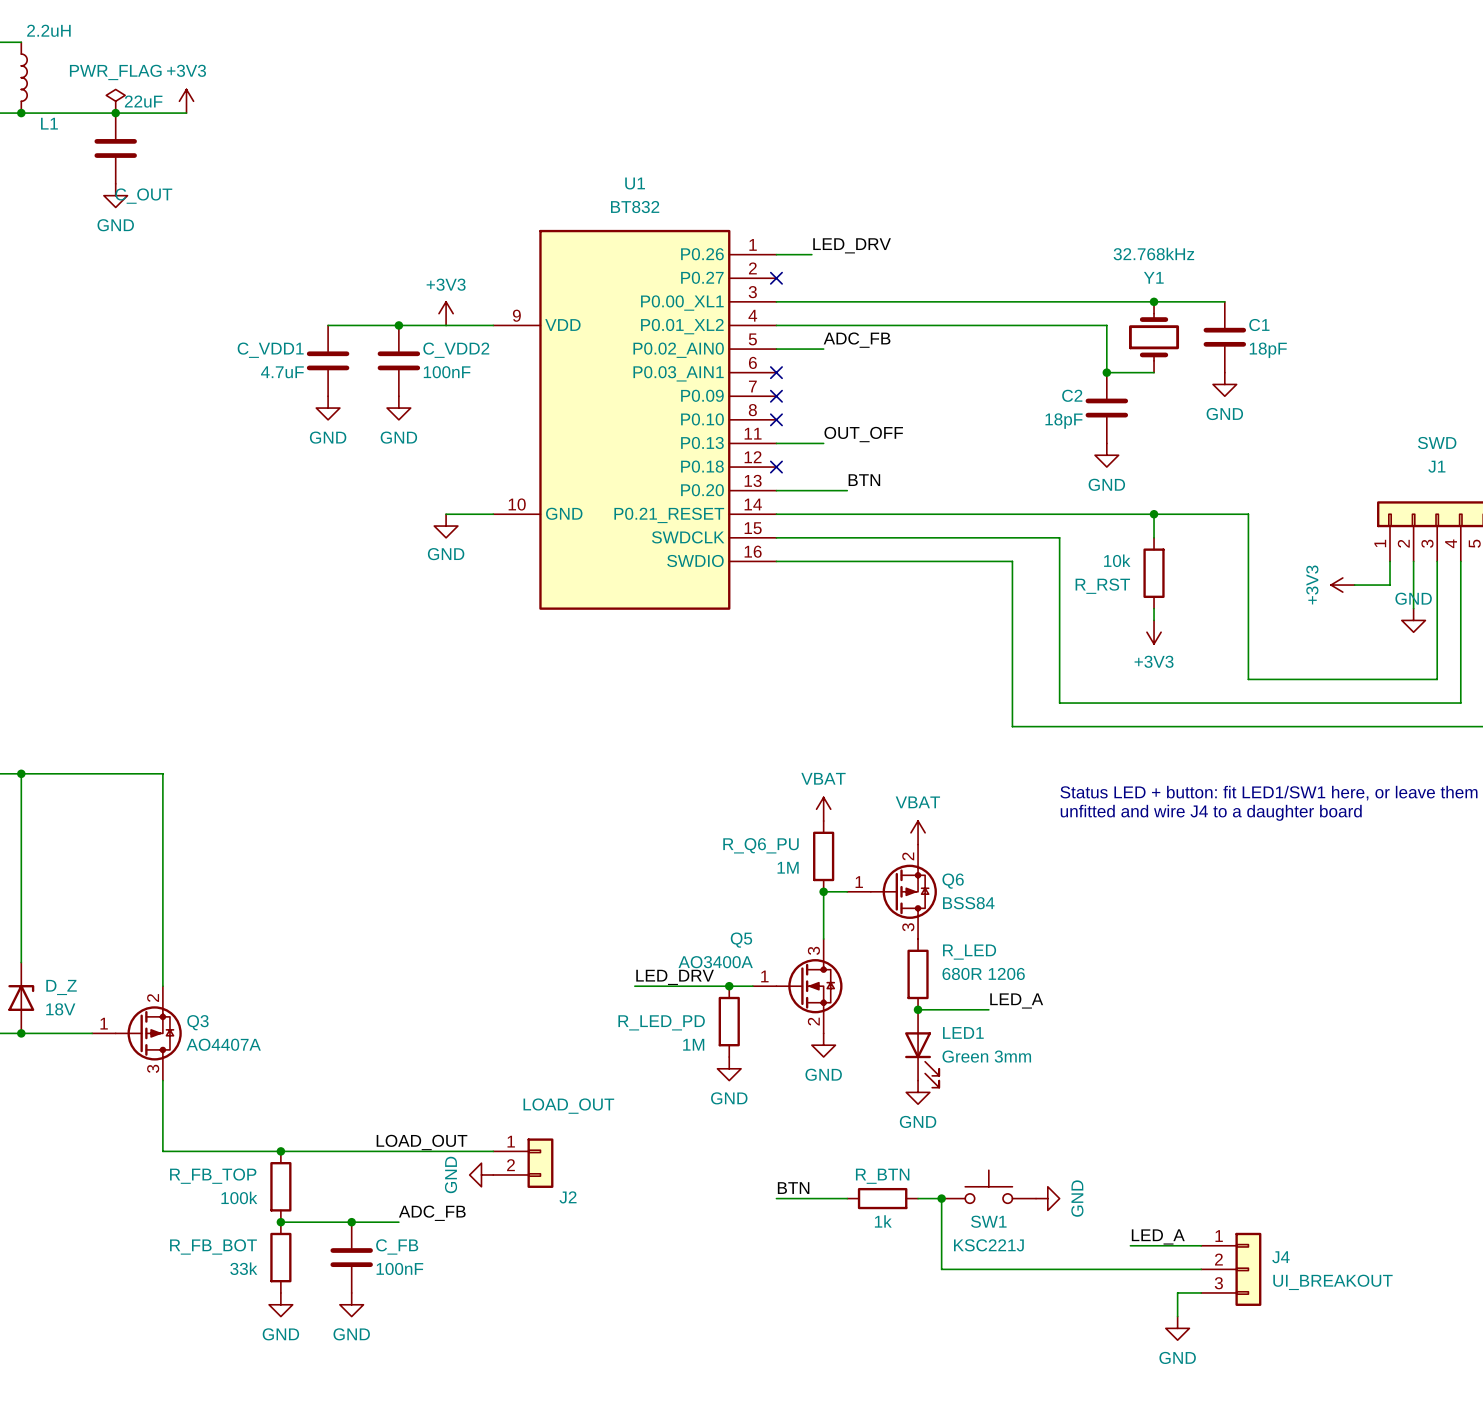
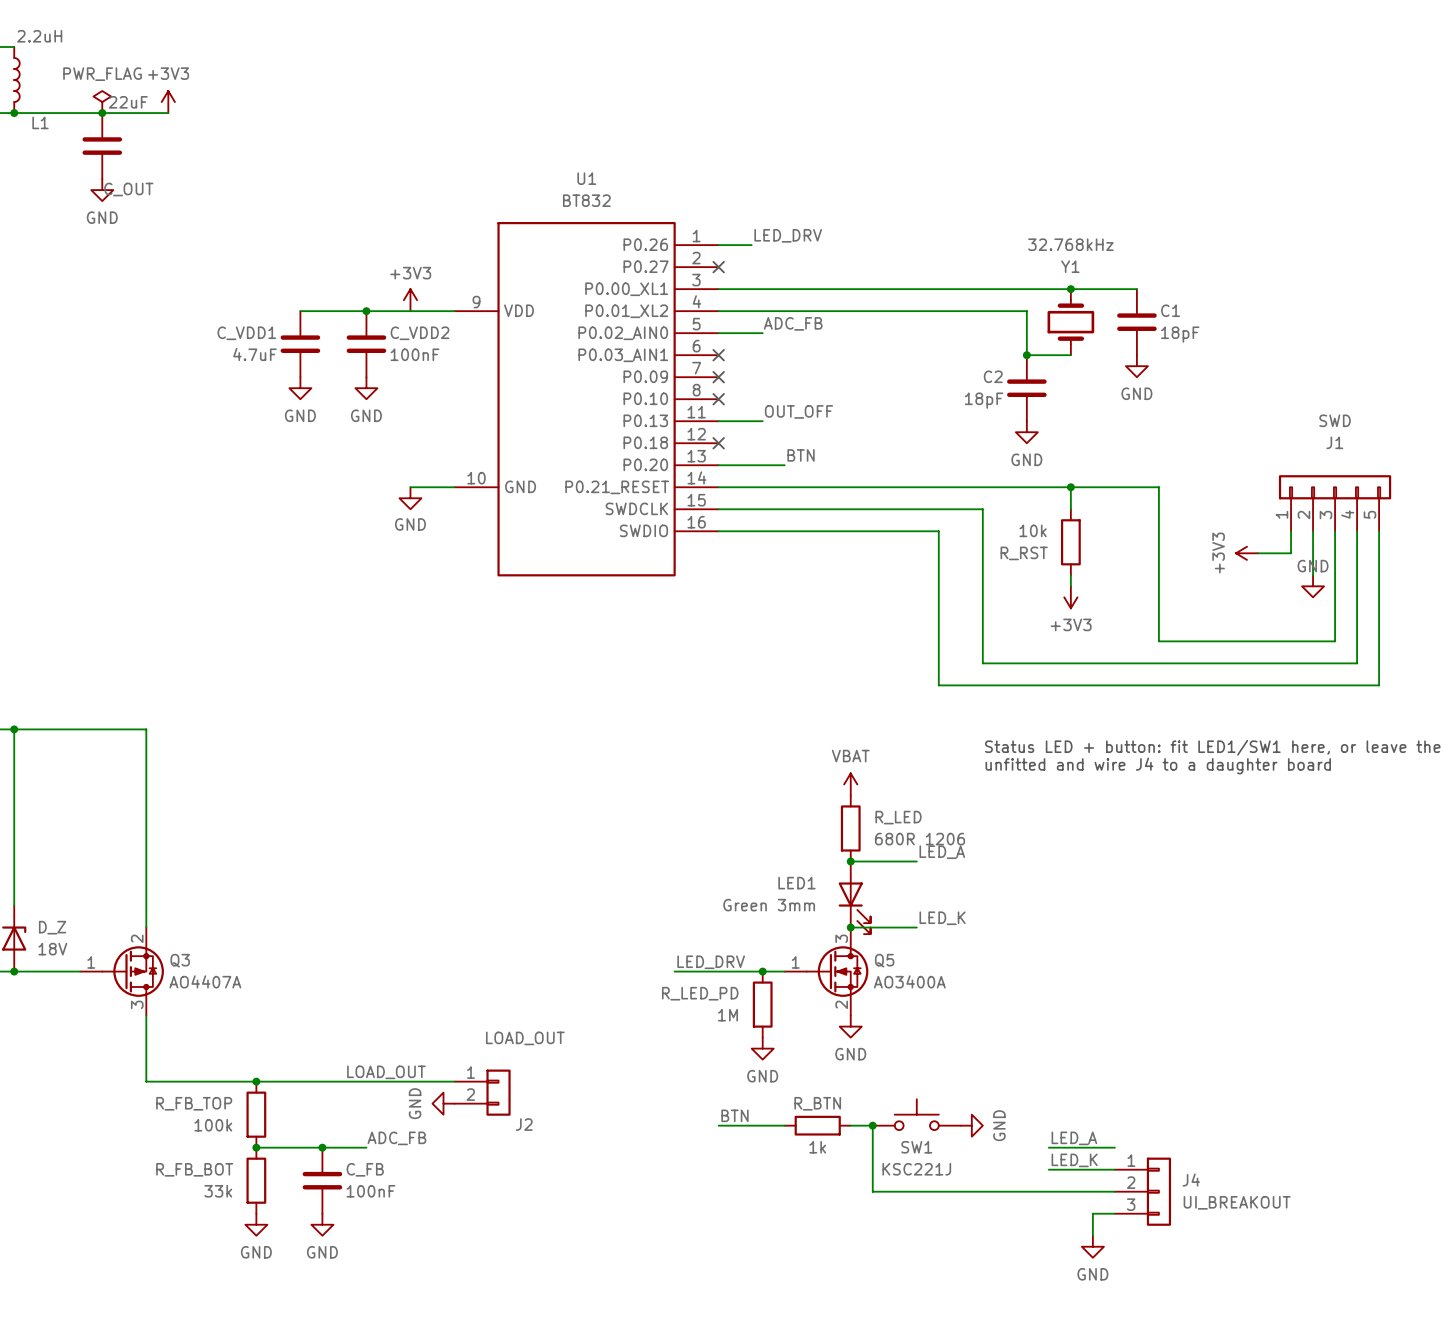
power symbol: VBAT (823, 809) -> none
R_Q6_PU: 1M (823, 856) -> none
junction: (823, 891) -> none
wire: (847, 891) (823, 891) (823, 939) -> none
Q6: BSS84 (892, 891) -> none
wire: none -> (850, 861) (916, 861)
junction: none -> (850, 861)
Q5 name position: Q5 (741, 940) -> Q5 (884, 960)
R_LED name position: R_LED (969, 952) -> R_LED (898, 817)
Q5 value position: AO3400A (715, 962) -> AO3400A (909, 981)
R_LED value position: 680R 1206 (983, 973) -> 680R 1206 (920, 839)
R_LED position: (918, 974) -> (850, 828)
label position: LED_DRV (675, 977) -> LED_DRV (711, 962)
label: none -> LED_K (942, 918)
wire: (634, 986) (752, 986) -> (674, 971) (784, 971)
junction: (729, 986) -> none
Q5 position: (797, 986) -> (826, 971)
label position: LED_A (1016, 1000) -> LED_A (942, 852)
wire: (918, 1009) (988, 1009) -> (850, 927) (916, 927)
junction position: (918, 1009) -> (850, 927)
R_LED_PD position: (729, 1021) -> (762, 1004)
R_LED_PD name position: R_LED_PD (661, 1022) -> R_LED_PD (700, 993)
LED1 name position: LED1 (963, 1032) -> LED1 (796, 883)
junction: none -> (762, 971)
R_LED_PD value position: 1M (693, 1044) -> 1M (728, 1015)
power symbol: GND (823, 1045) -> none
LED1 position: (922, 1048) -> (854, 897)
LED1 value position: Green 3mm (986, 1056) -> Green 3mm (769, 905)
power symbol: GND (729, 1068) -> none
power symbol: none -> GND (762, 1048)
label: none -> LED_A (1074, 1138)
wire: none -> (1048, 1147) (1114, 1147)
label: LED_A (1158, 1236) -> LED_K (1074, 1160)

